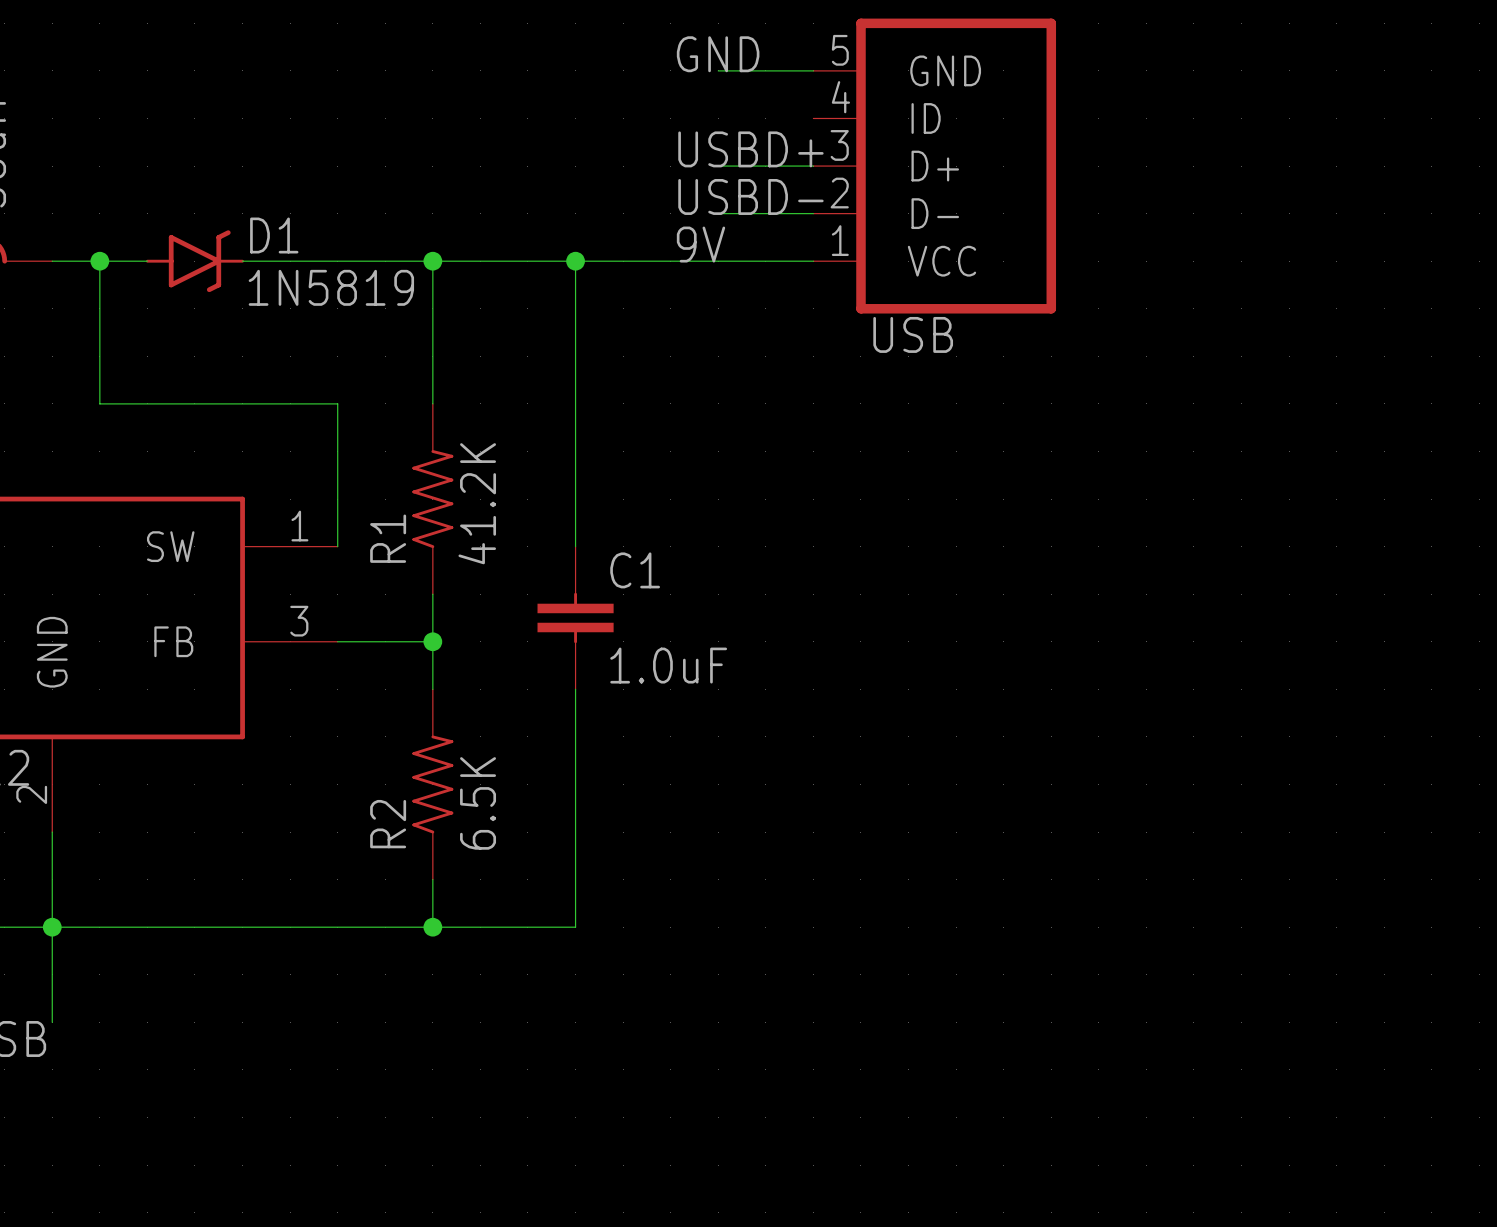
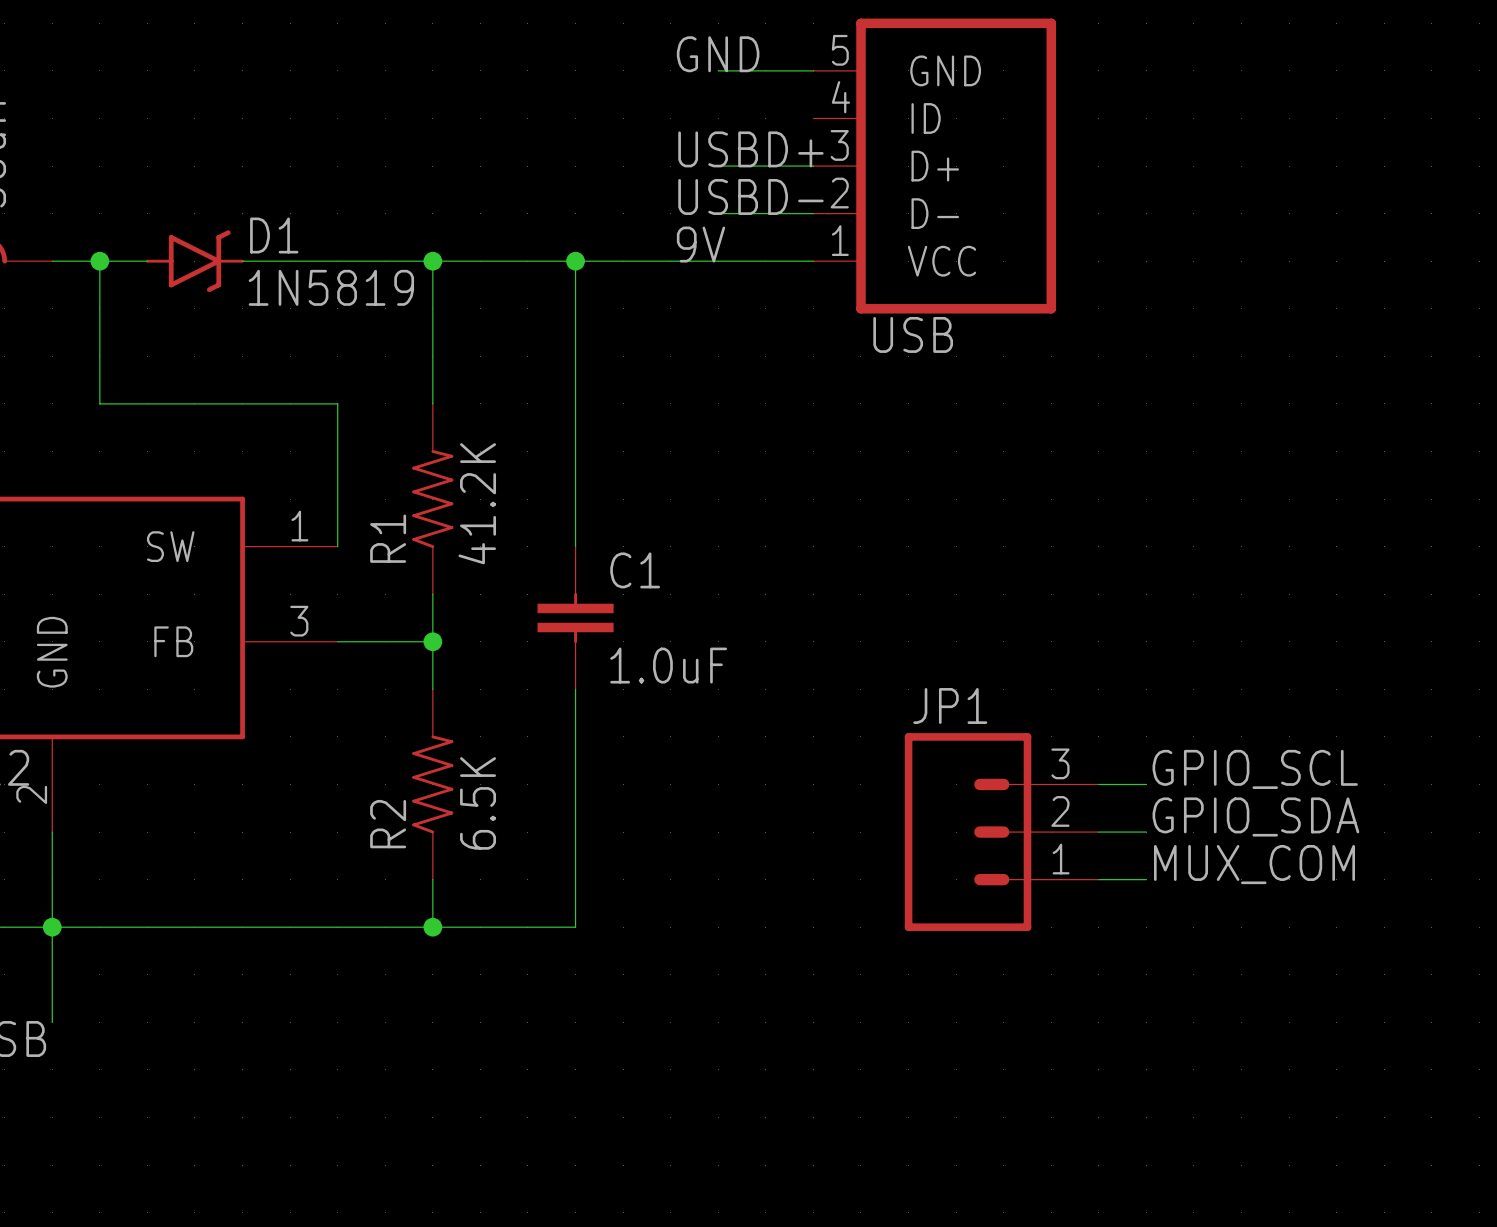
label: none -> GPIO_SCL (1255, 769)
wire: none -> (1098, 784) (1146, 784)
label: none -> GPIO_SDA (1255, 816)
JP1: none -> (1001, 832)
wire: none -> (1098, 832) (1146, 832)
label: none -> MUX_COM (1254, 864)
wire: none -> (1098, 879) (1146, 879)

